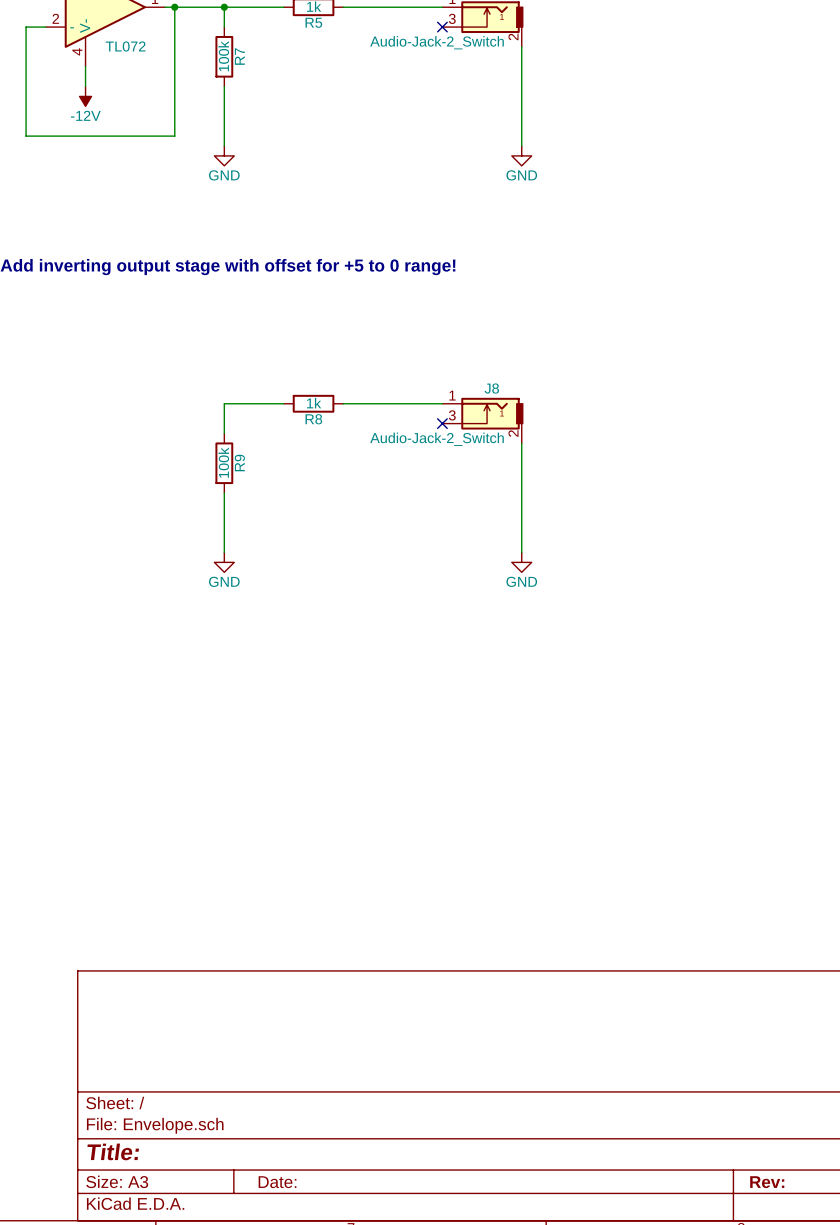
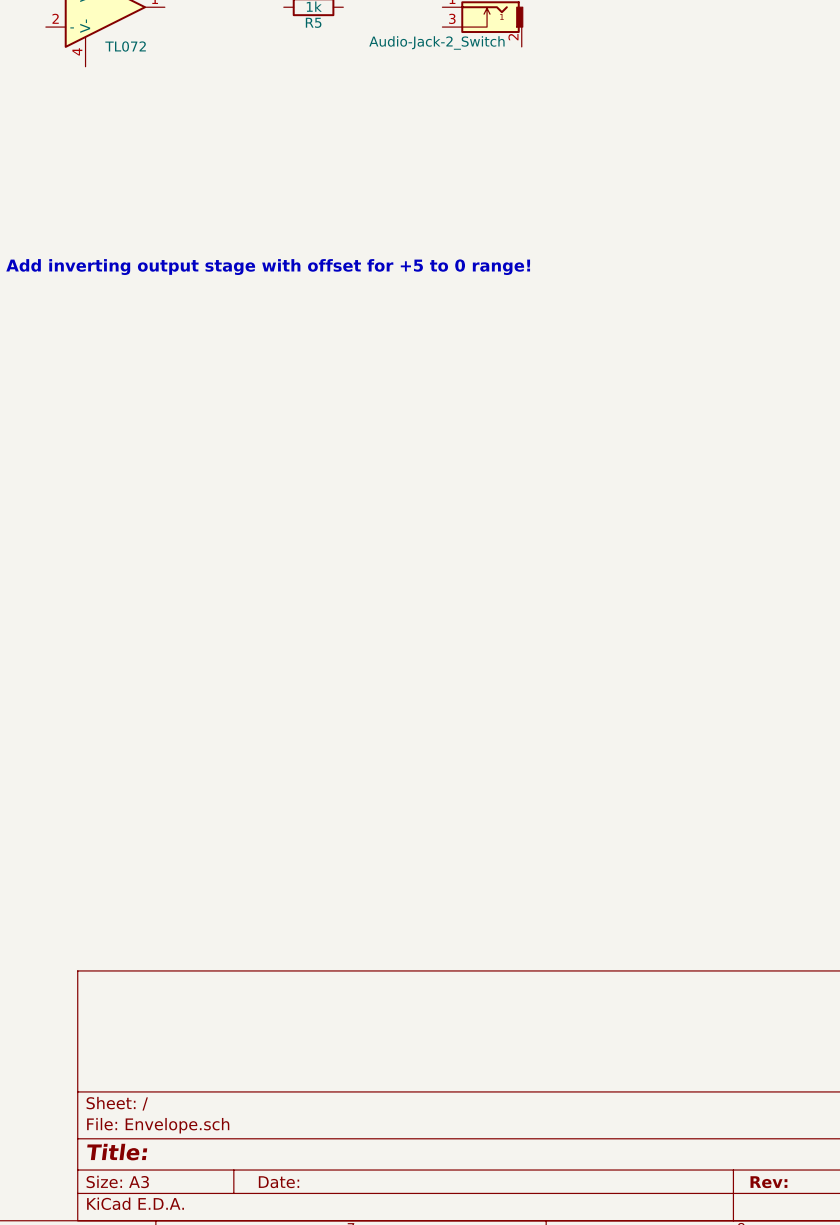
wire: (164, 7) (283, 7) -> none
wire: (174, 7) (174, 136) (26, 136) (26, 27) (45, 27) -> none
junction: (174, 7) -> none
wire: (224, 7) (224, 27) -> none
junction: (224, 7) -> none
wire: (343, 7) (442, 7) -> none
no-connect mark: (442, 27) -> none
wire: (521, 46) (521, 146) -> none
R7: 100k (224, 56) -> none
wire: (85, 66) (85, 86) -> none
wire: (224, 86) (224, 146) -> none
power symbol: -12V (85, 96) -> none
power symbol: GND (224, 155) -> none
power symbol: GND (521, 155) -> none
wire: (283, 403) (224, 403) (224, 433) -> none
R8: 1k (313, 403) -> none
wire: (343, 403) (442, 403) -> none
J8: Audio-Jack-2_Switch (482, 420) -> none
no-connect mark: (442, 423) -> none
wire: (521, 443) (521, 552) -> none
R9: 100k (224, 463) -> none
wire: (224, 492) (224, 552) -> none
power symbol: GND (224, 562) -> none
power symbol: GND (521, 562) -> none

